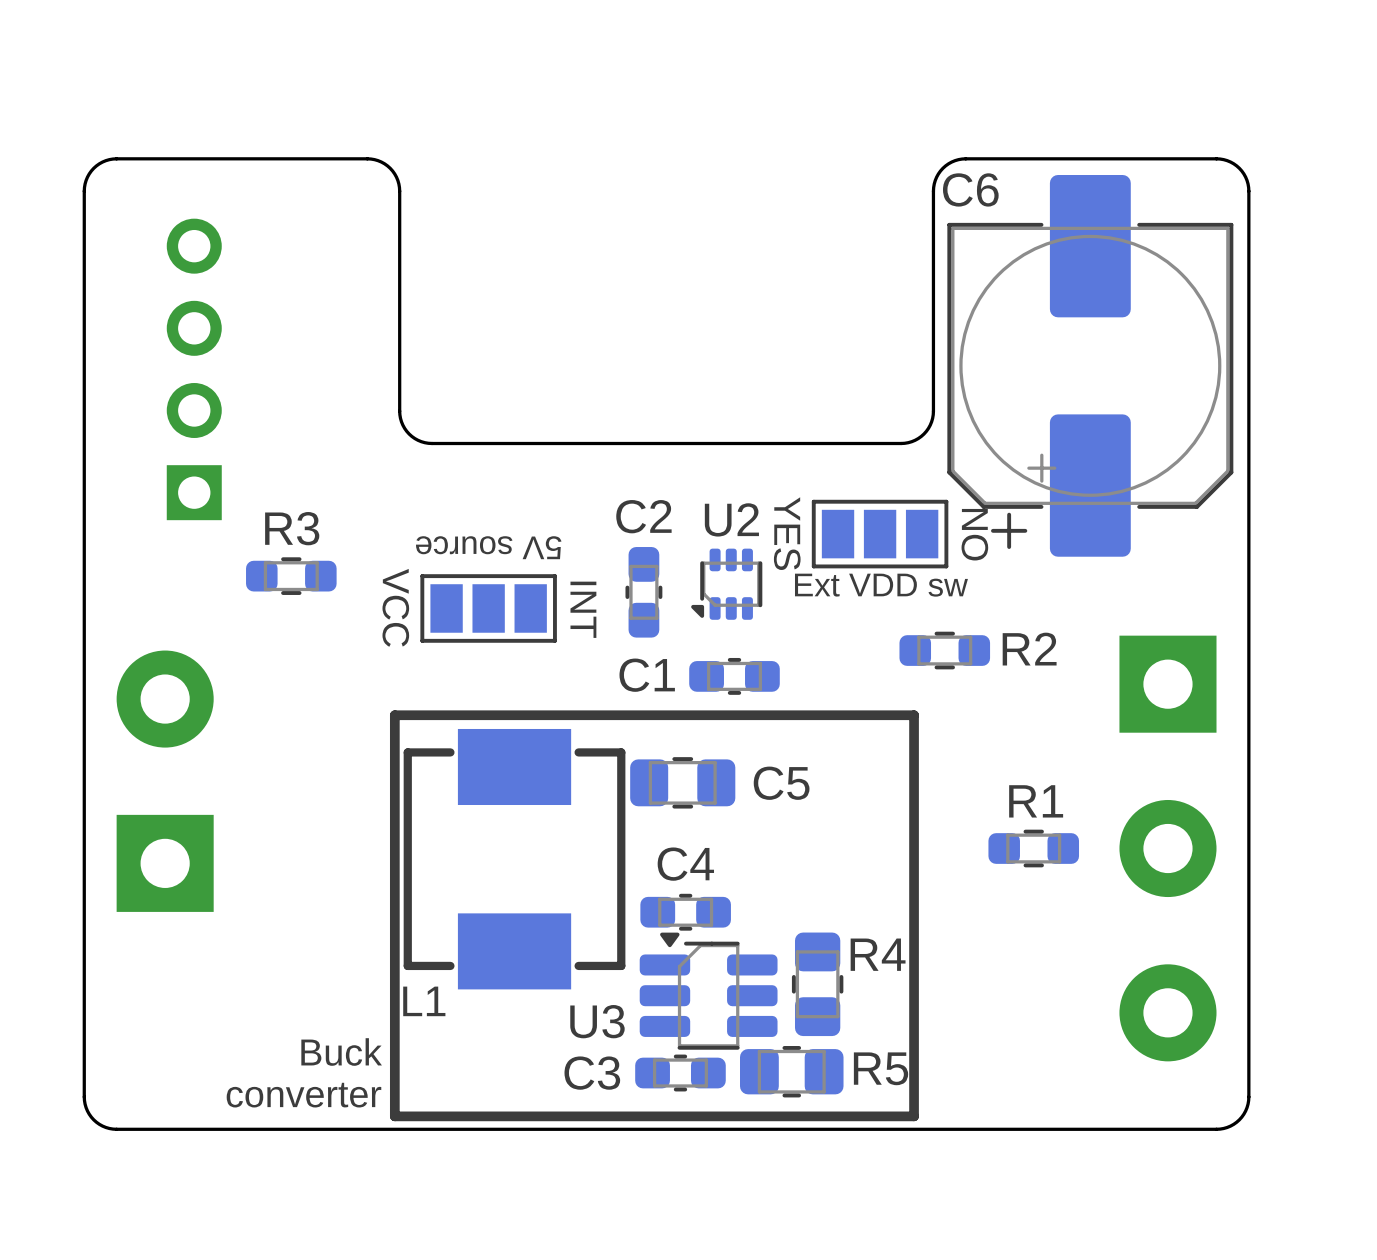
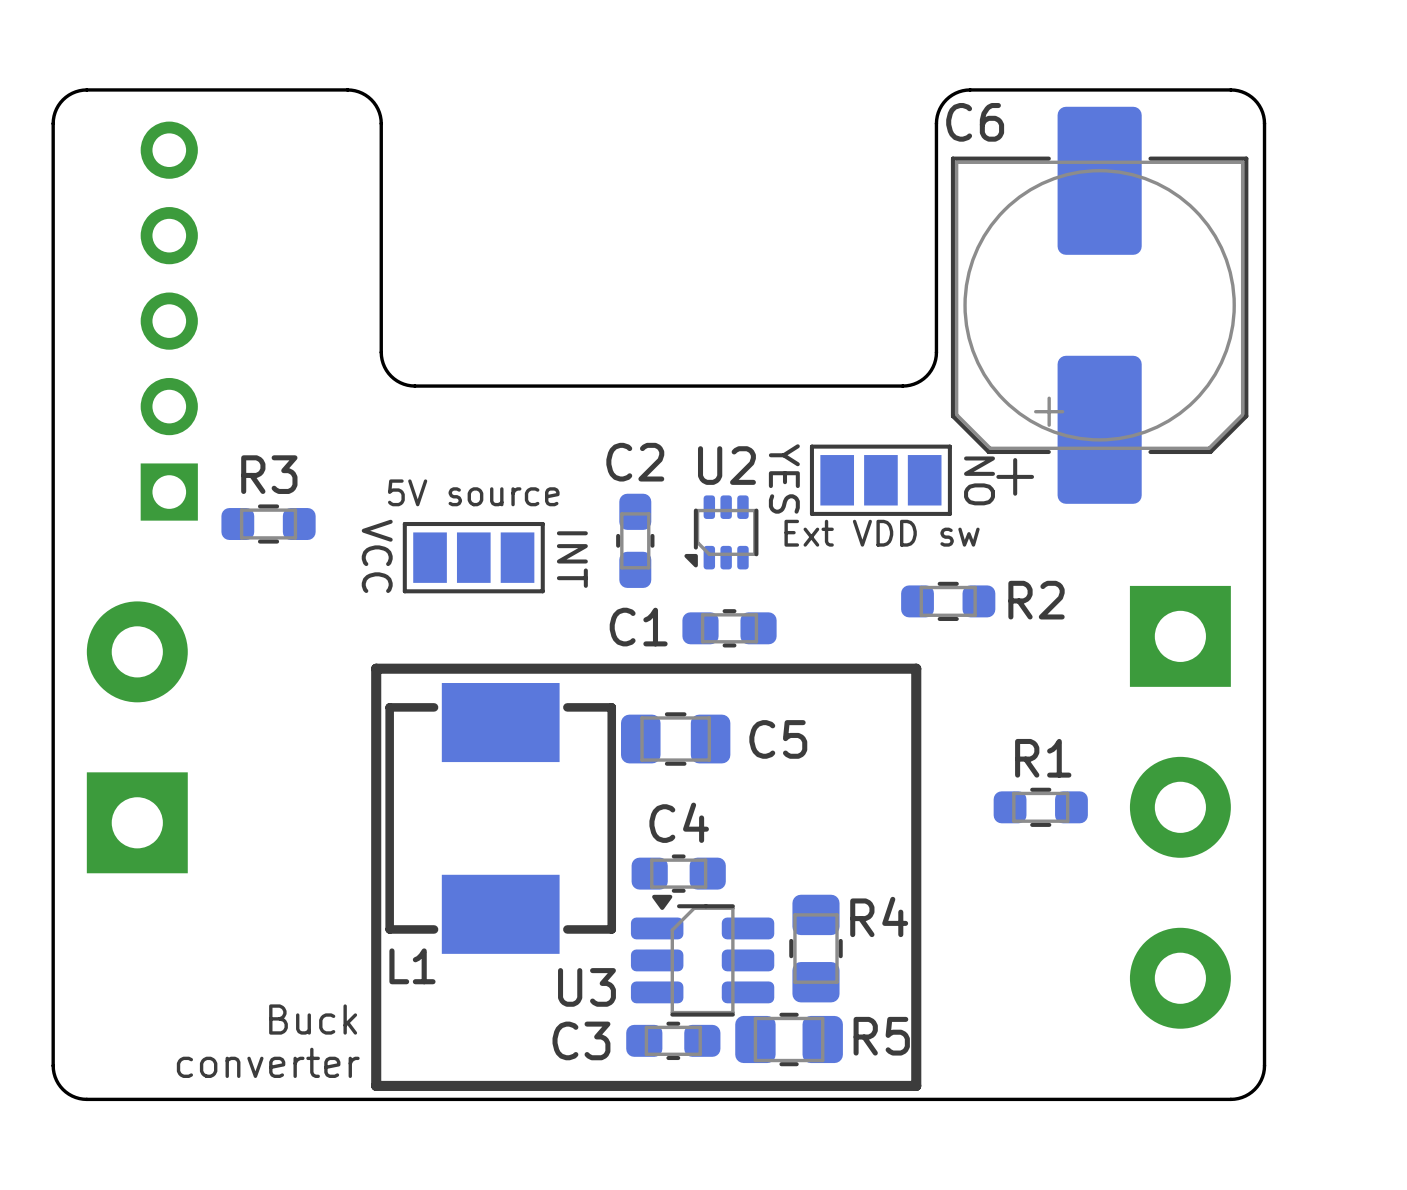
part footprint: [166, 218, 222, 521] -> [140, 121, 198, 521]
text rotation: 0° (488, 547) -> 180° (473, 492)

